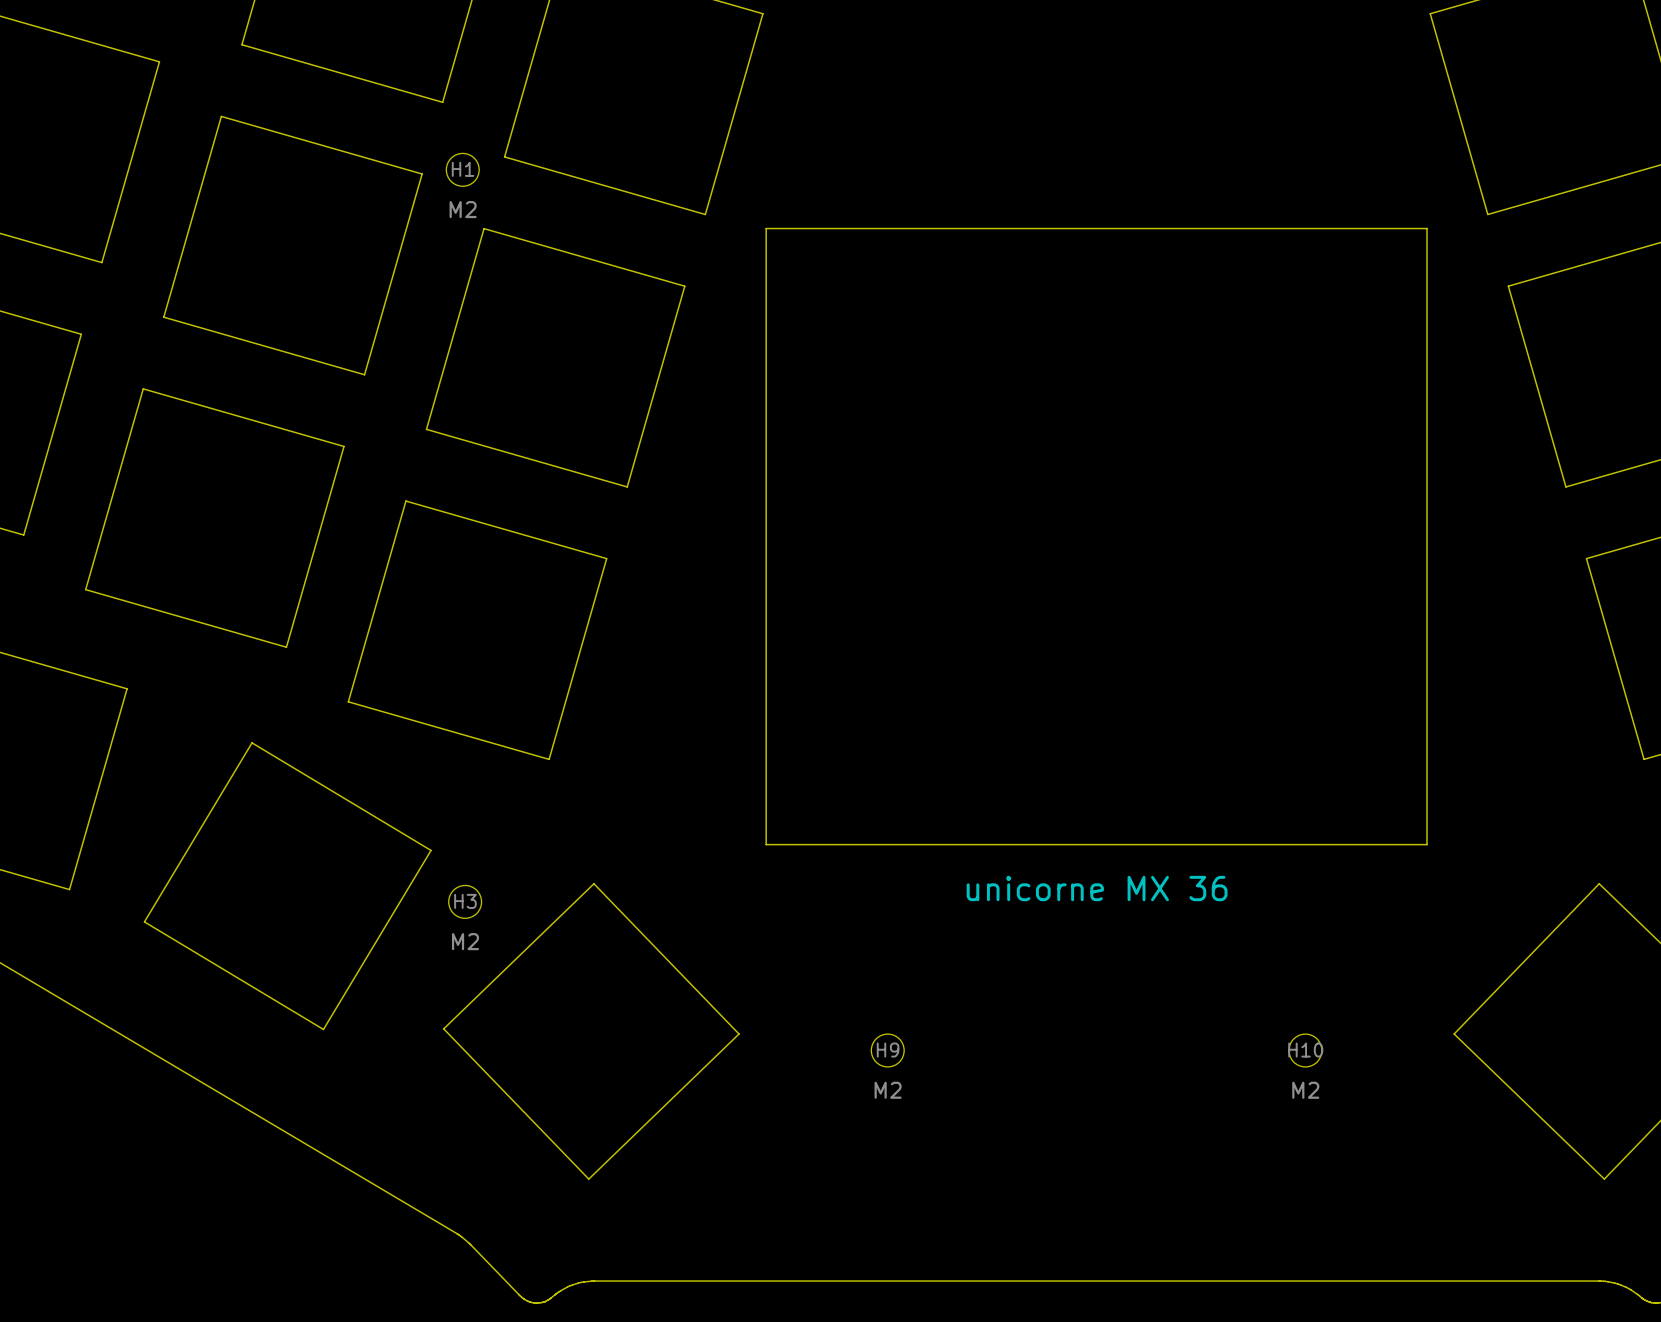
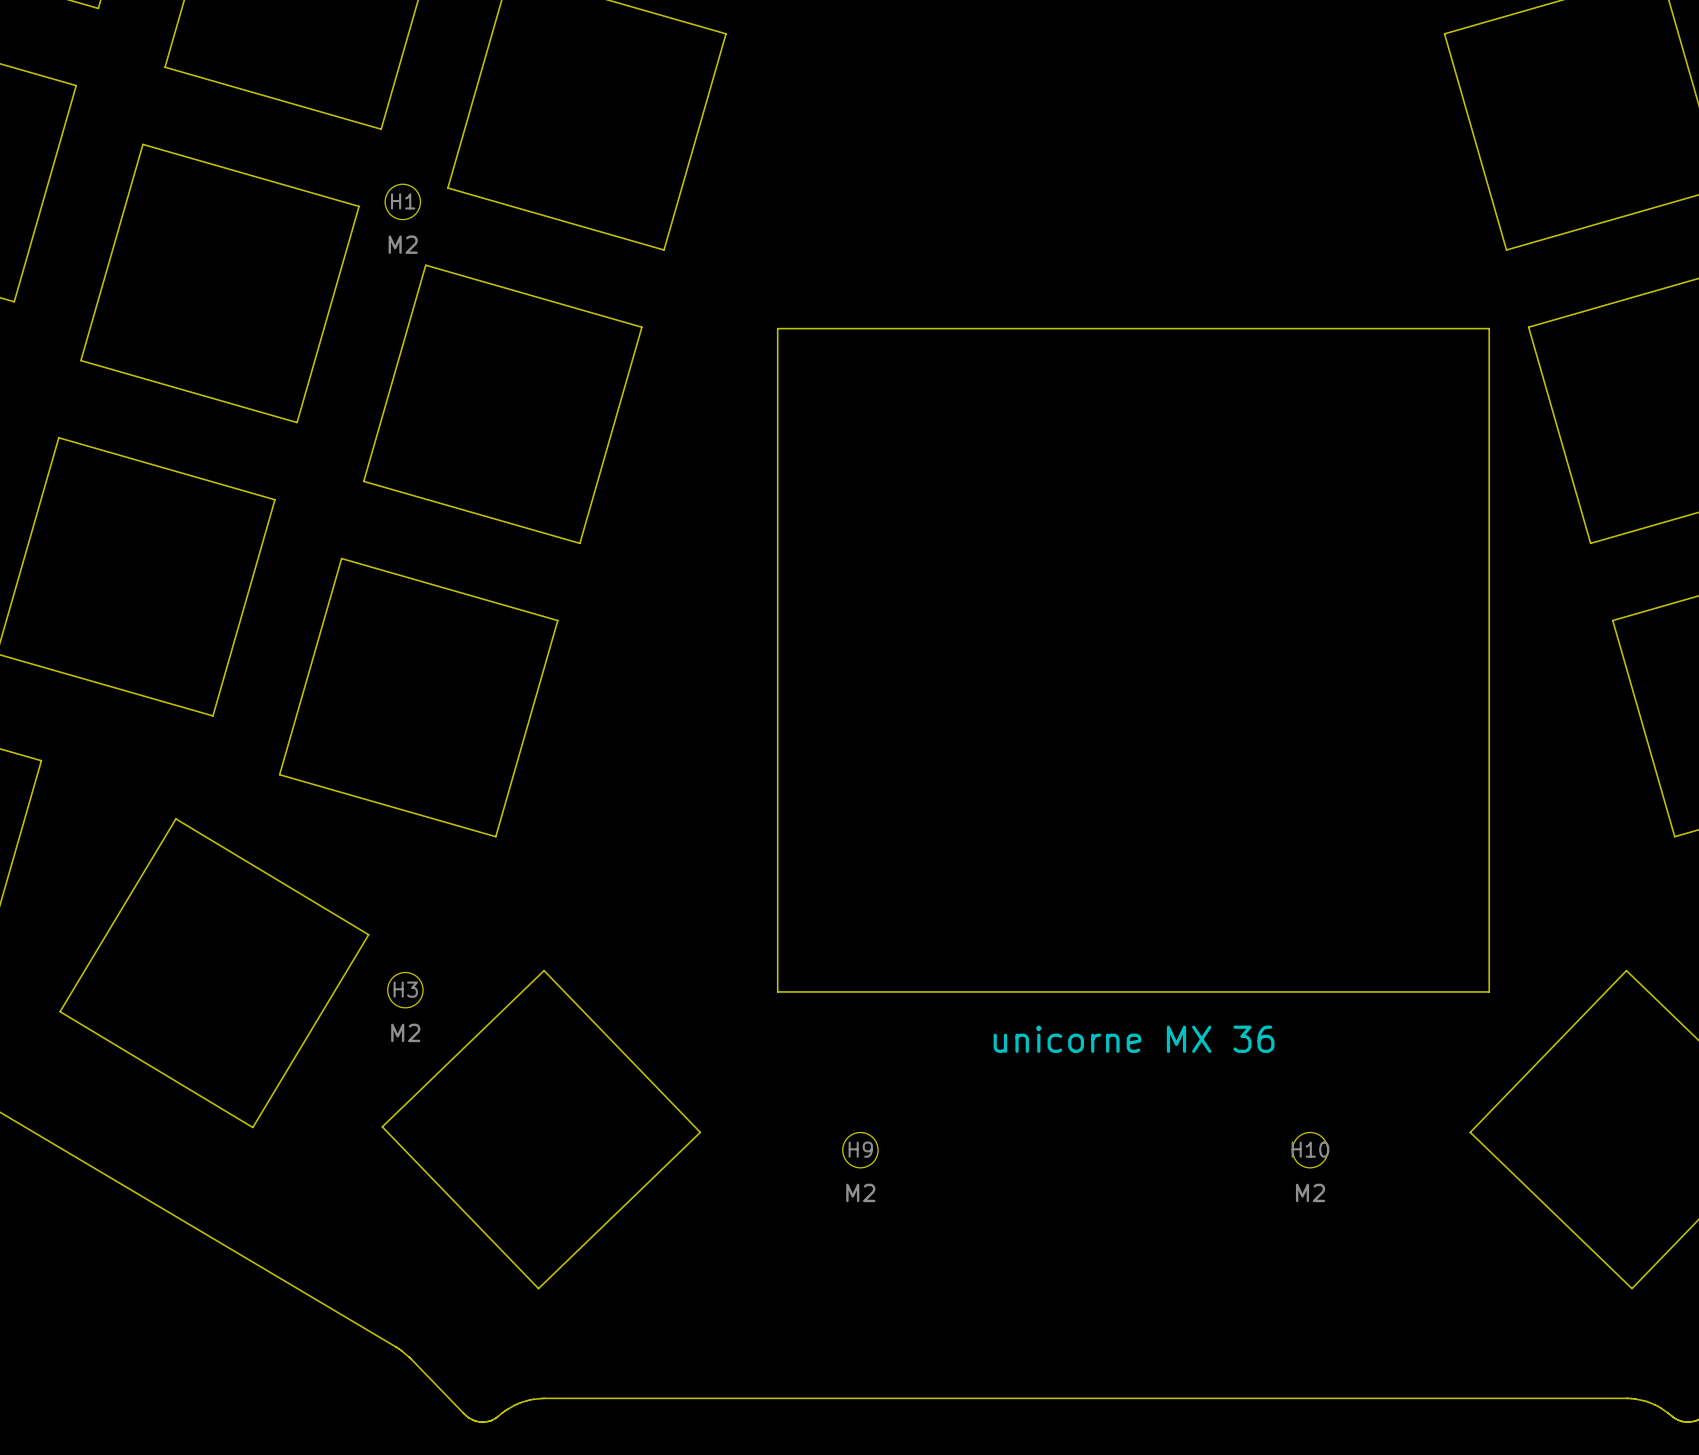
board edge: (766, 228) (1427, 228) (1427, 844) (766, 844) (766, 228) -> (777, 328) (1489, 328) (1489, 991) (777, 991) (777, 328)
text position: unicorne MX 36 (1097, 888) -> unicorne MX 36 (1134, 1039)

